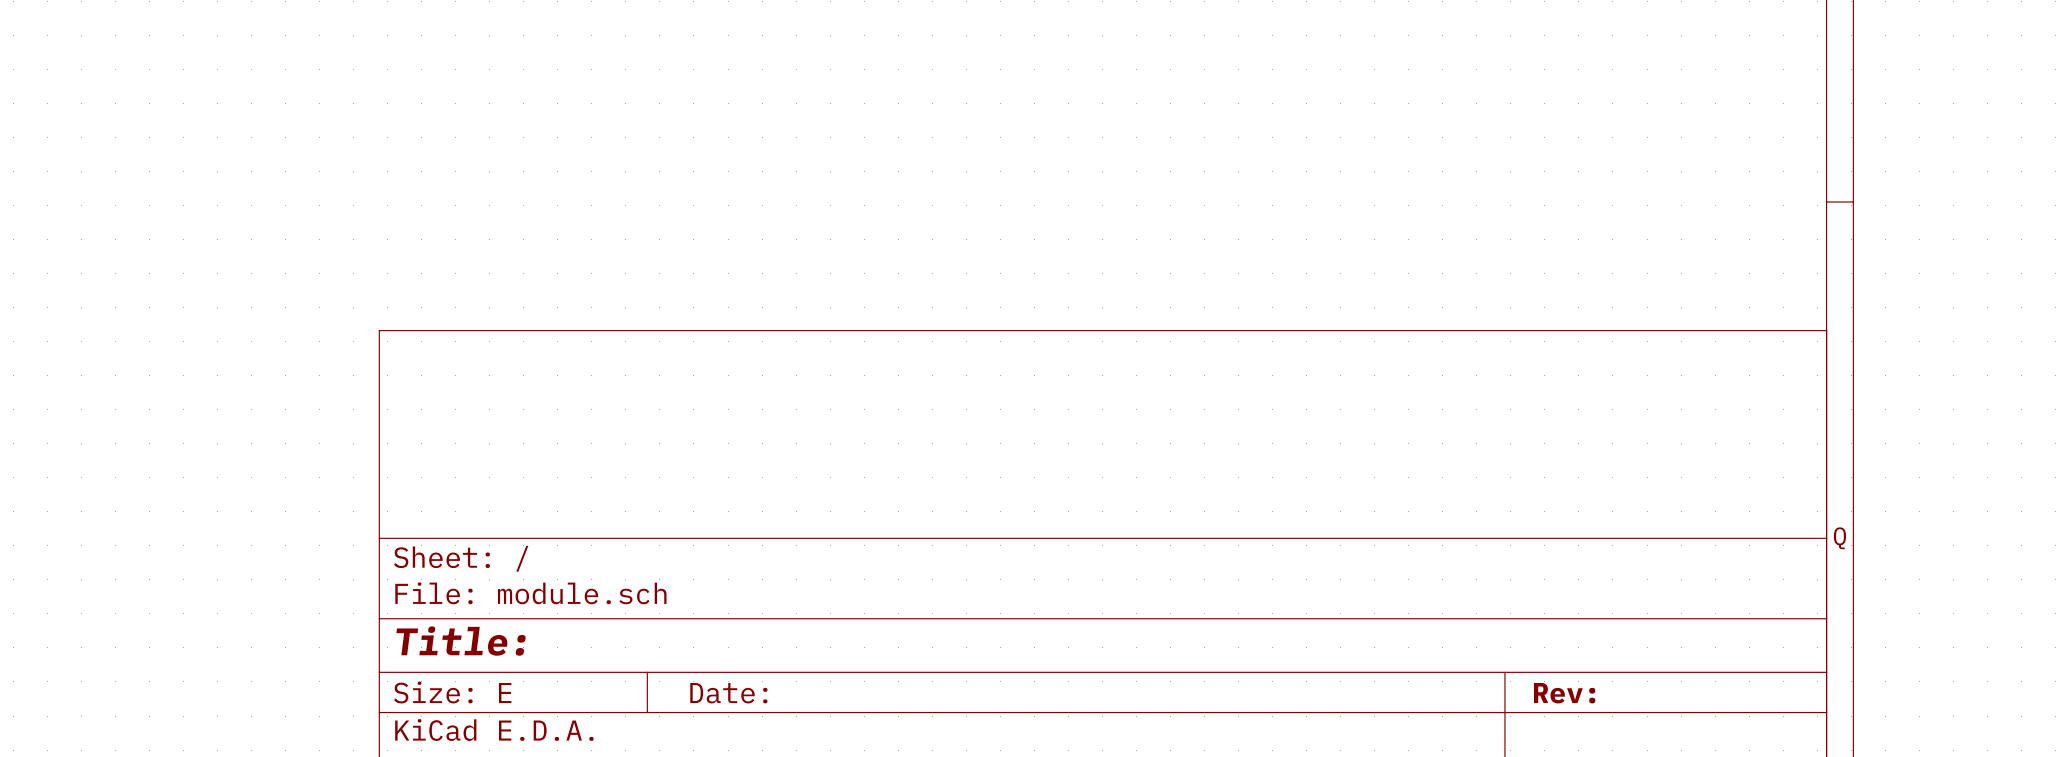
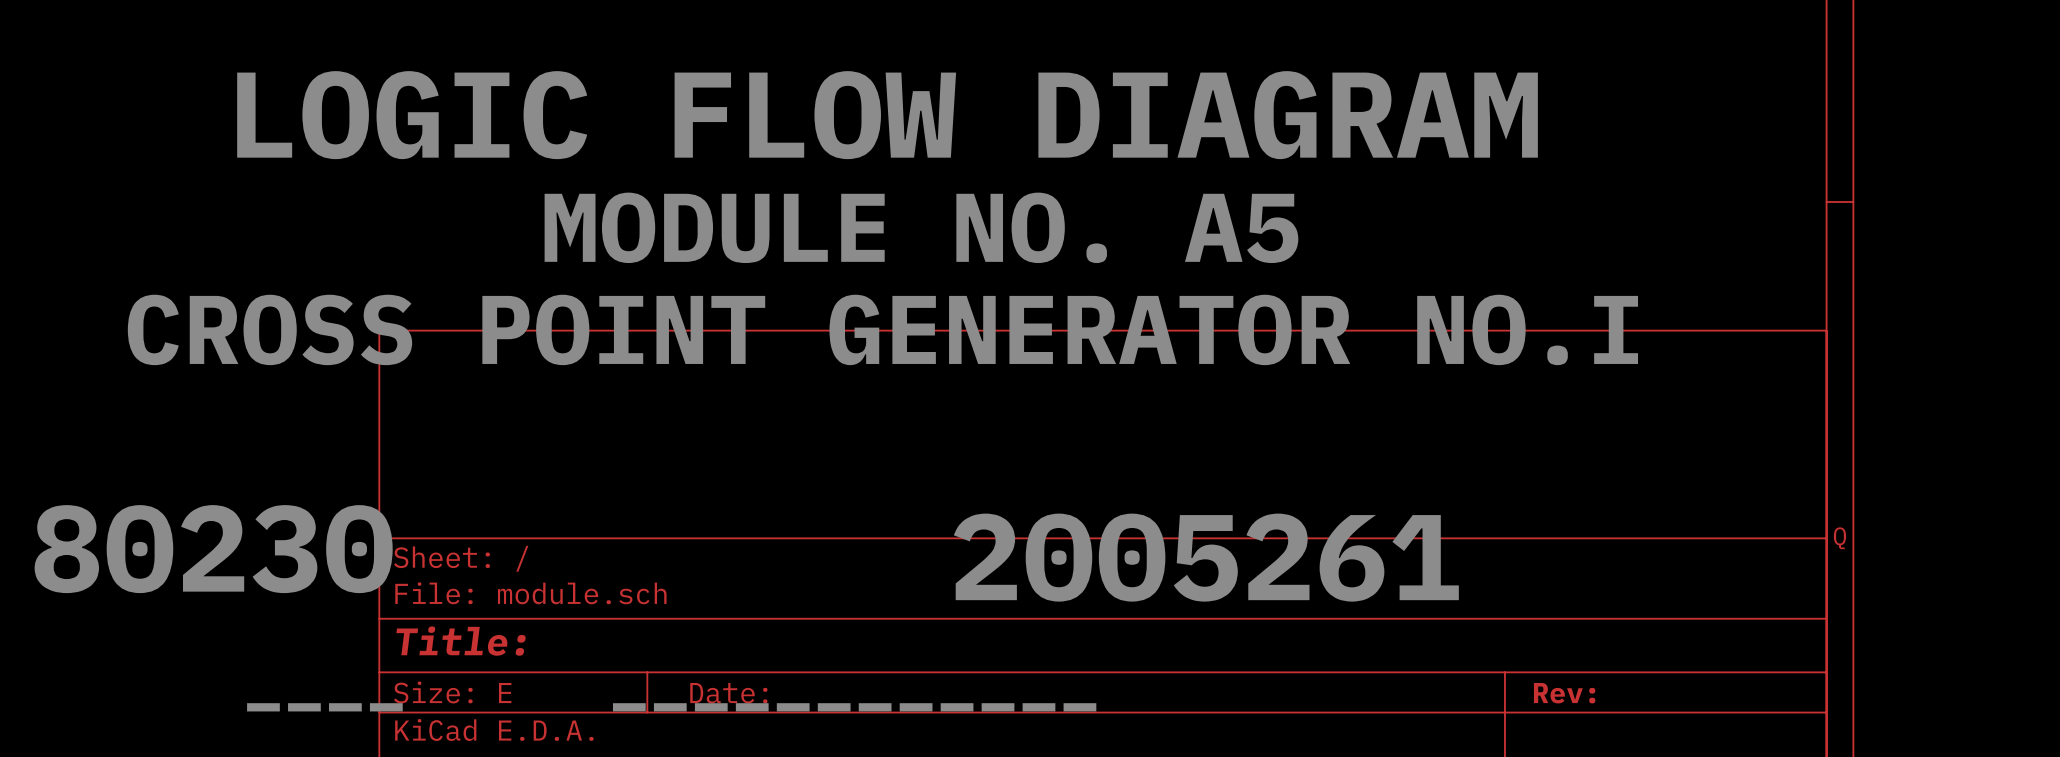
text: none -> LOGIC FLOW DIAGRAM (887, 115)
text: none -> MODULE NO. A5 (921, 227)
text: none -> CROSS POINT GENERATOR NO.I (882, 329)
text: none -> 80230 (213, 549)
text: none -> 2005261 (1206, 557)
text: none -> ____ (324, 707)
text: none -> ____________ (854, 707)

